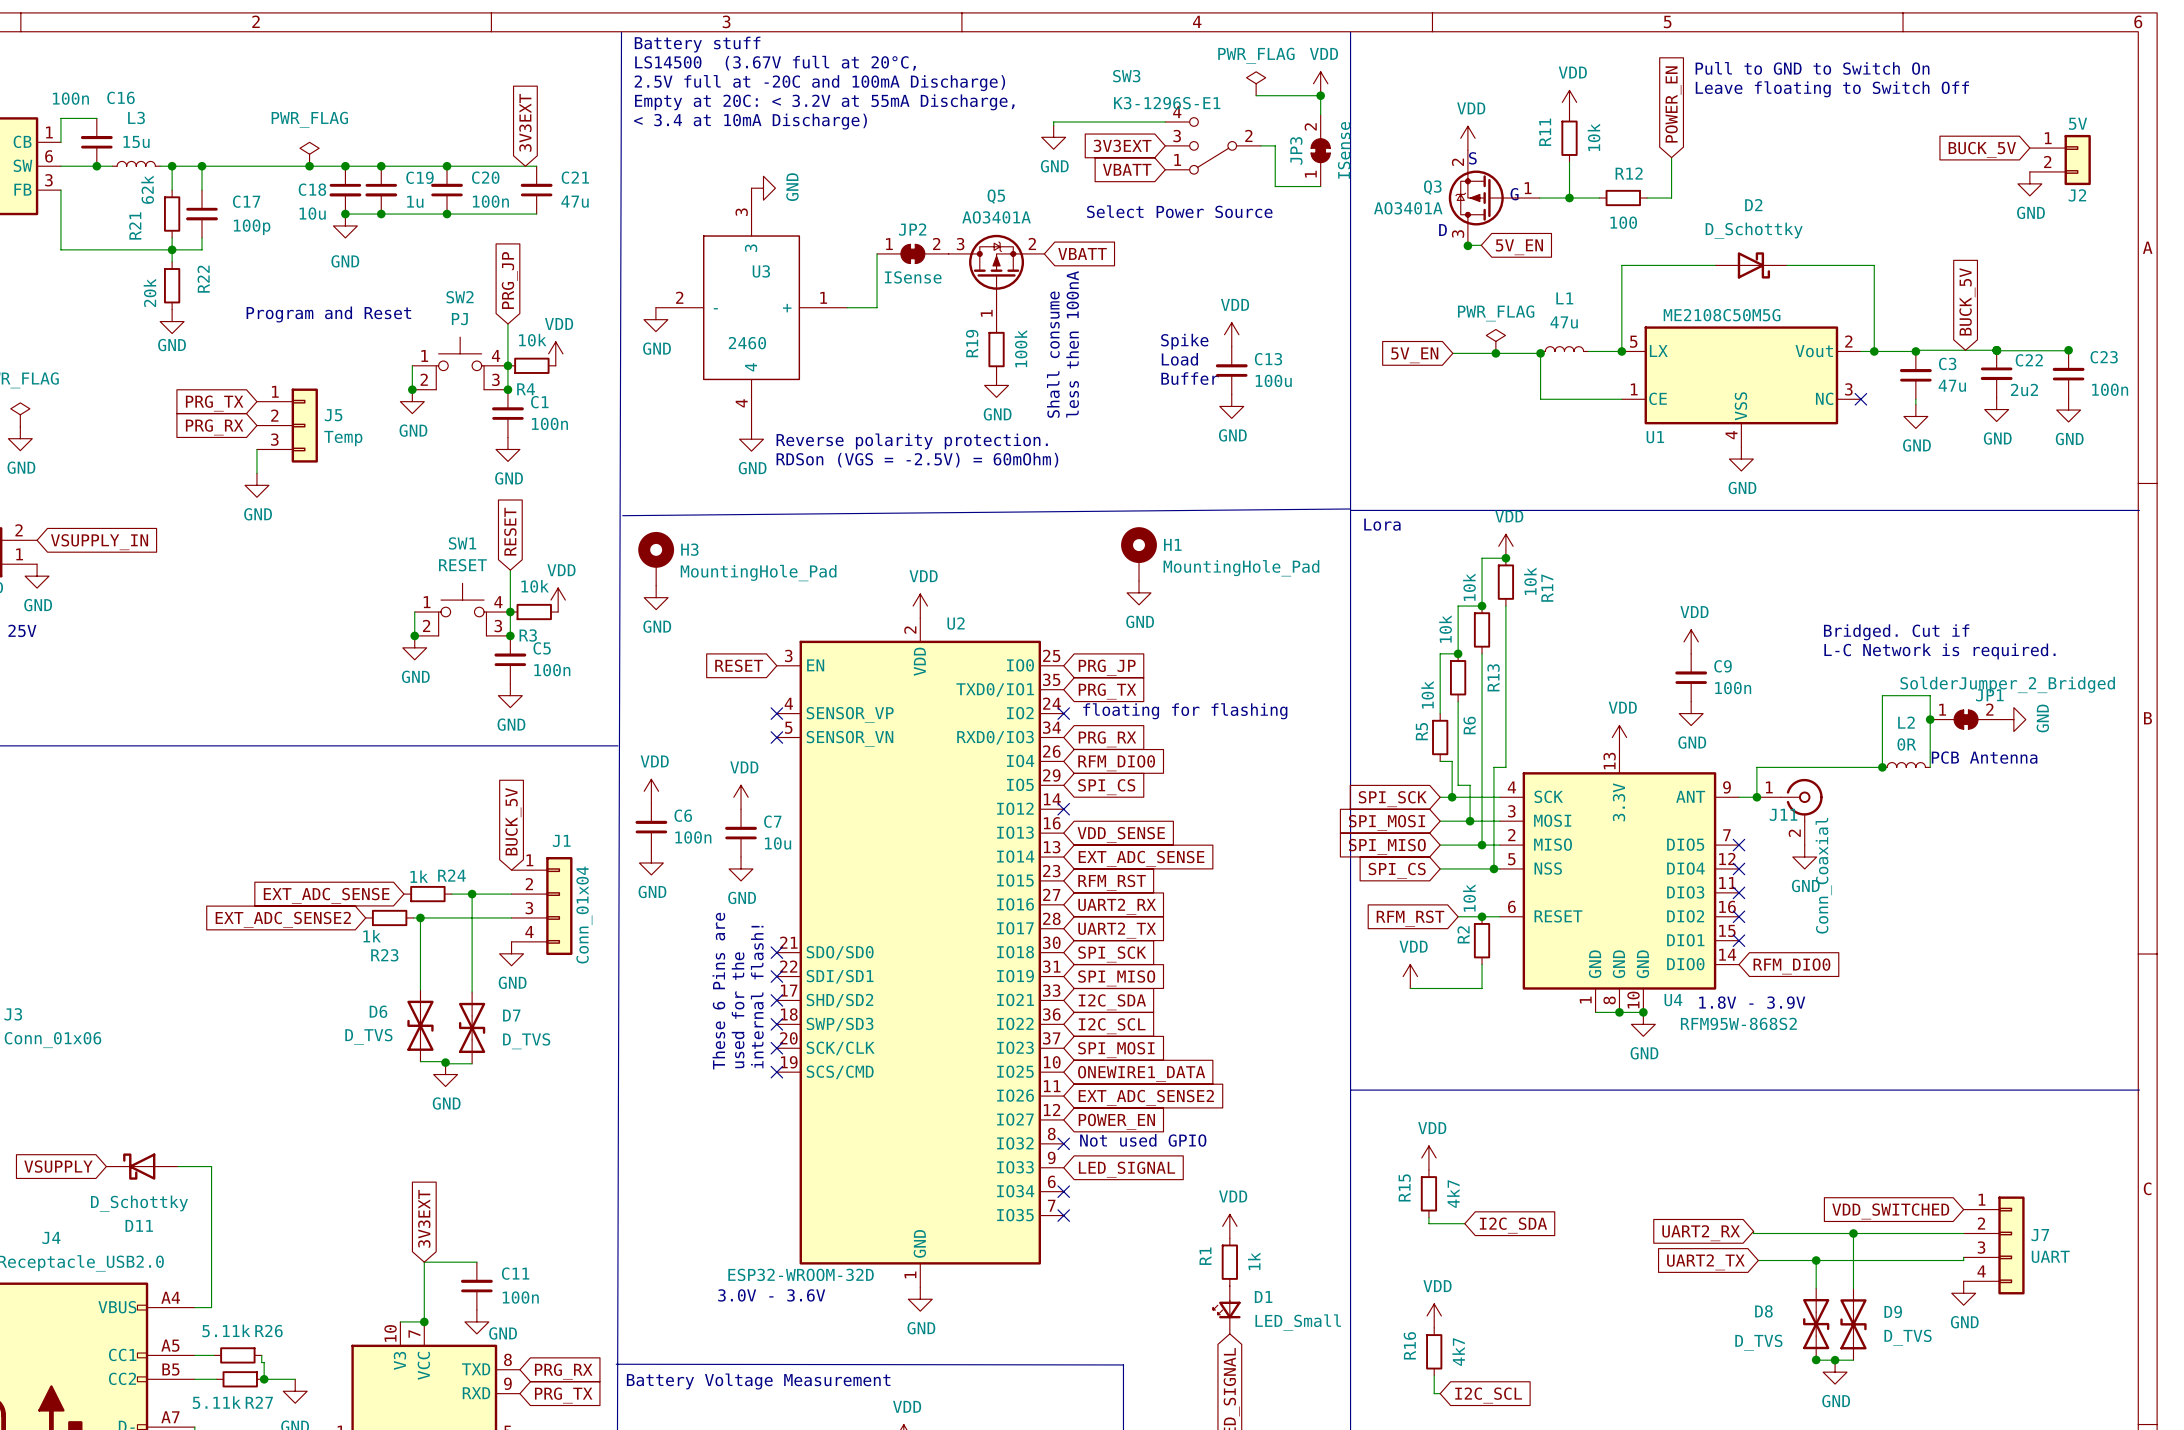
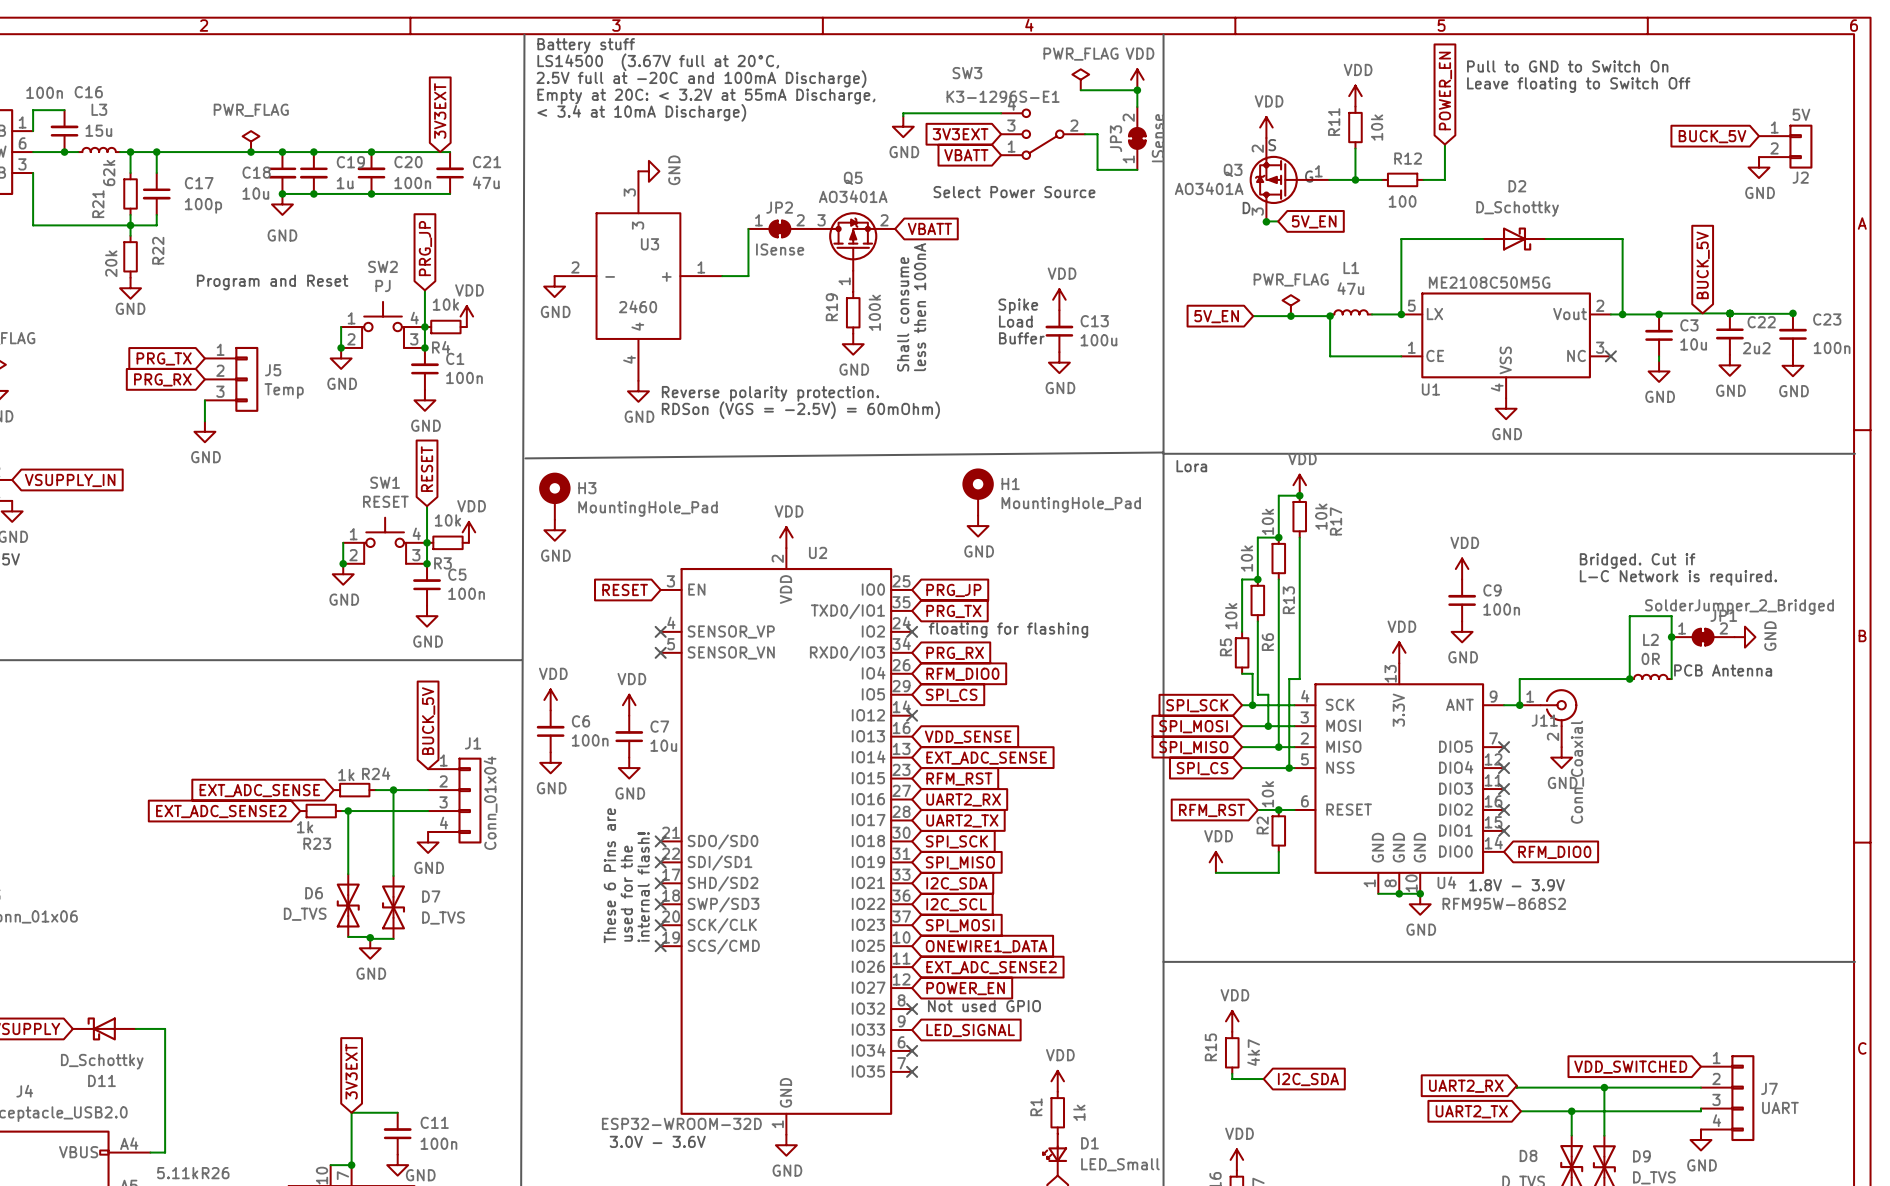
C3 value: 47u (1952, 385) -> 10u (1693, 344)

